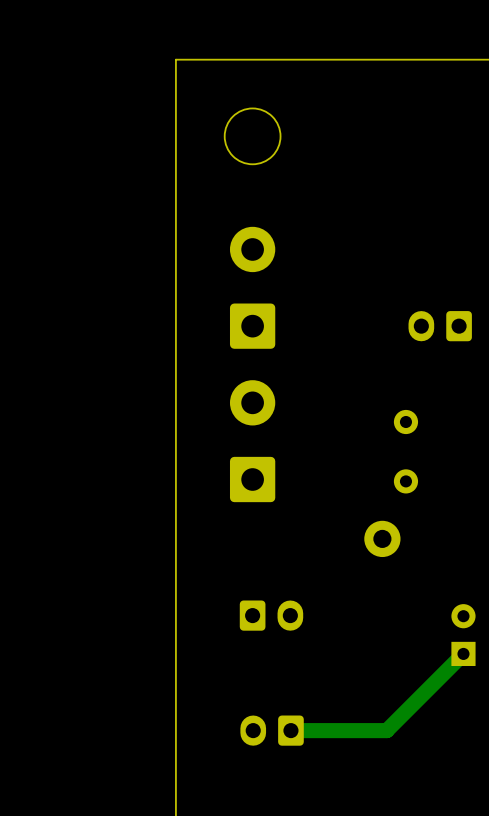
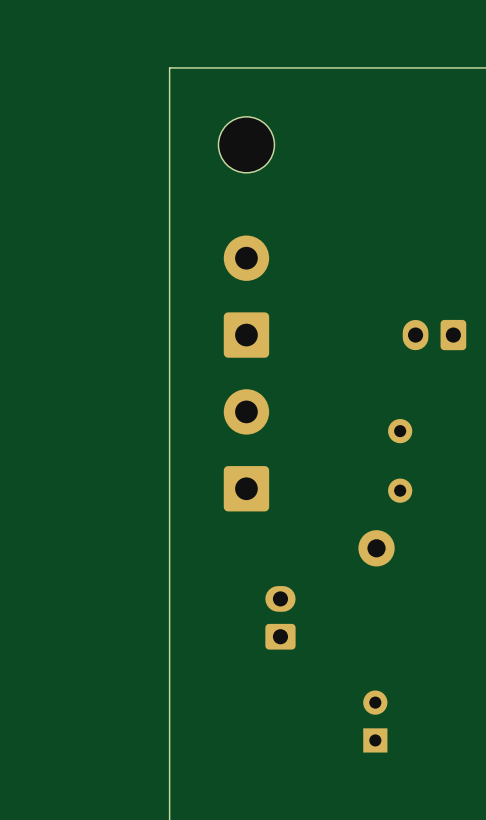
part rotation: 0° (271, 615) -> 90° counterclockwise (280, 617)
part position: (463, 635) -> (375, 721)
track: (463, 653) (386, 730) (290, 730) -> none
part: (272, 730) -> none

